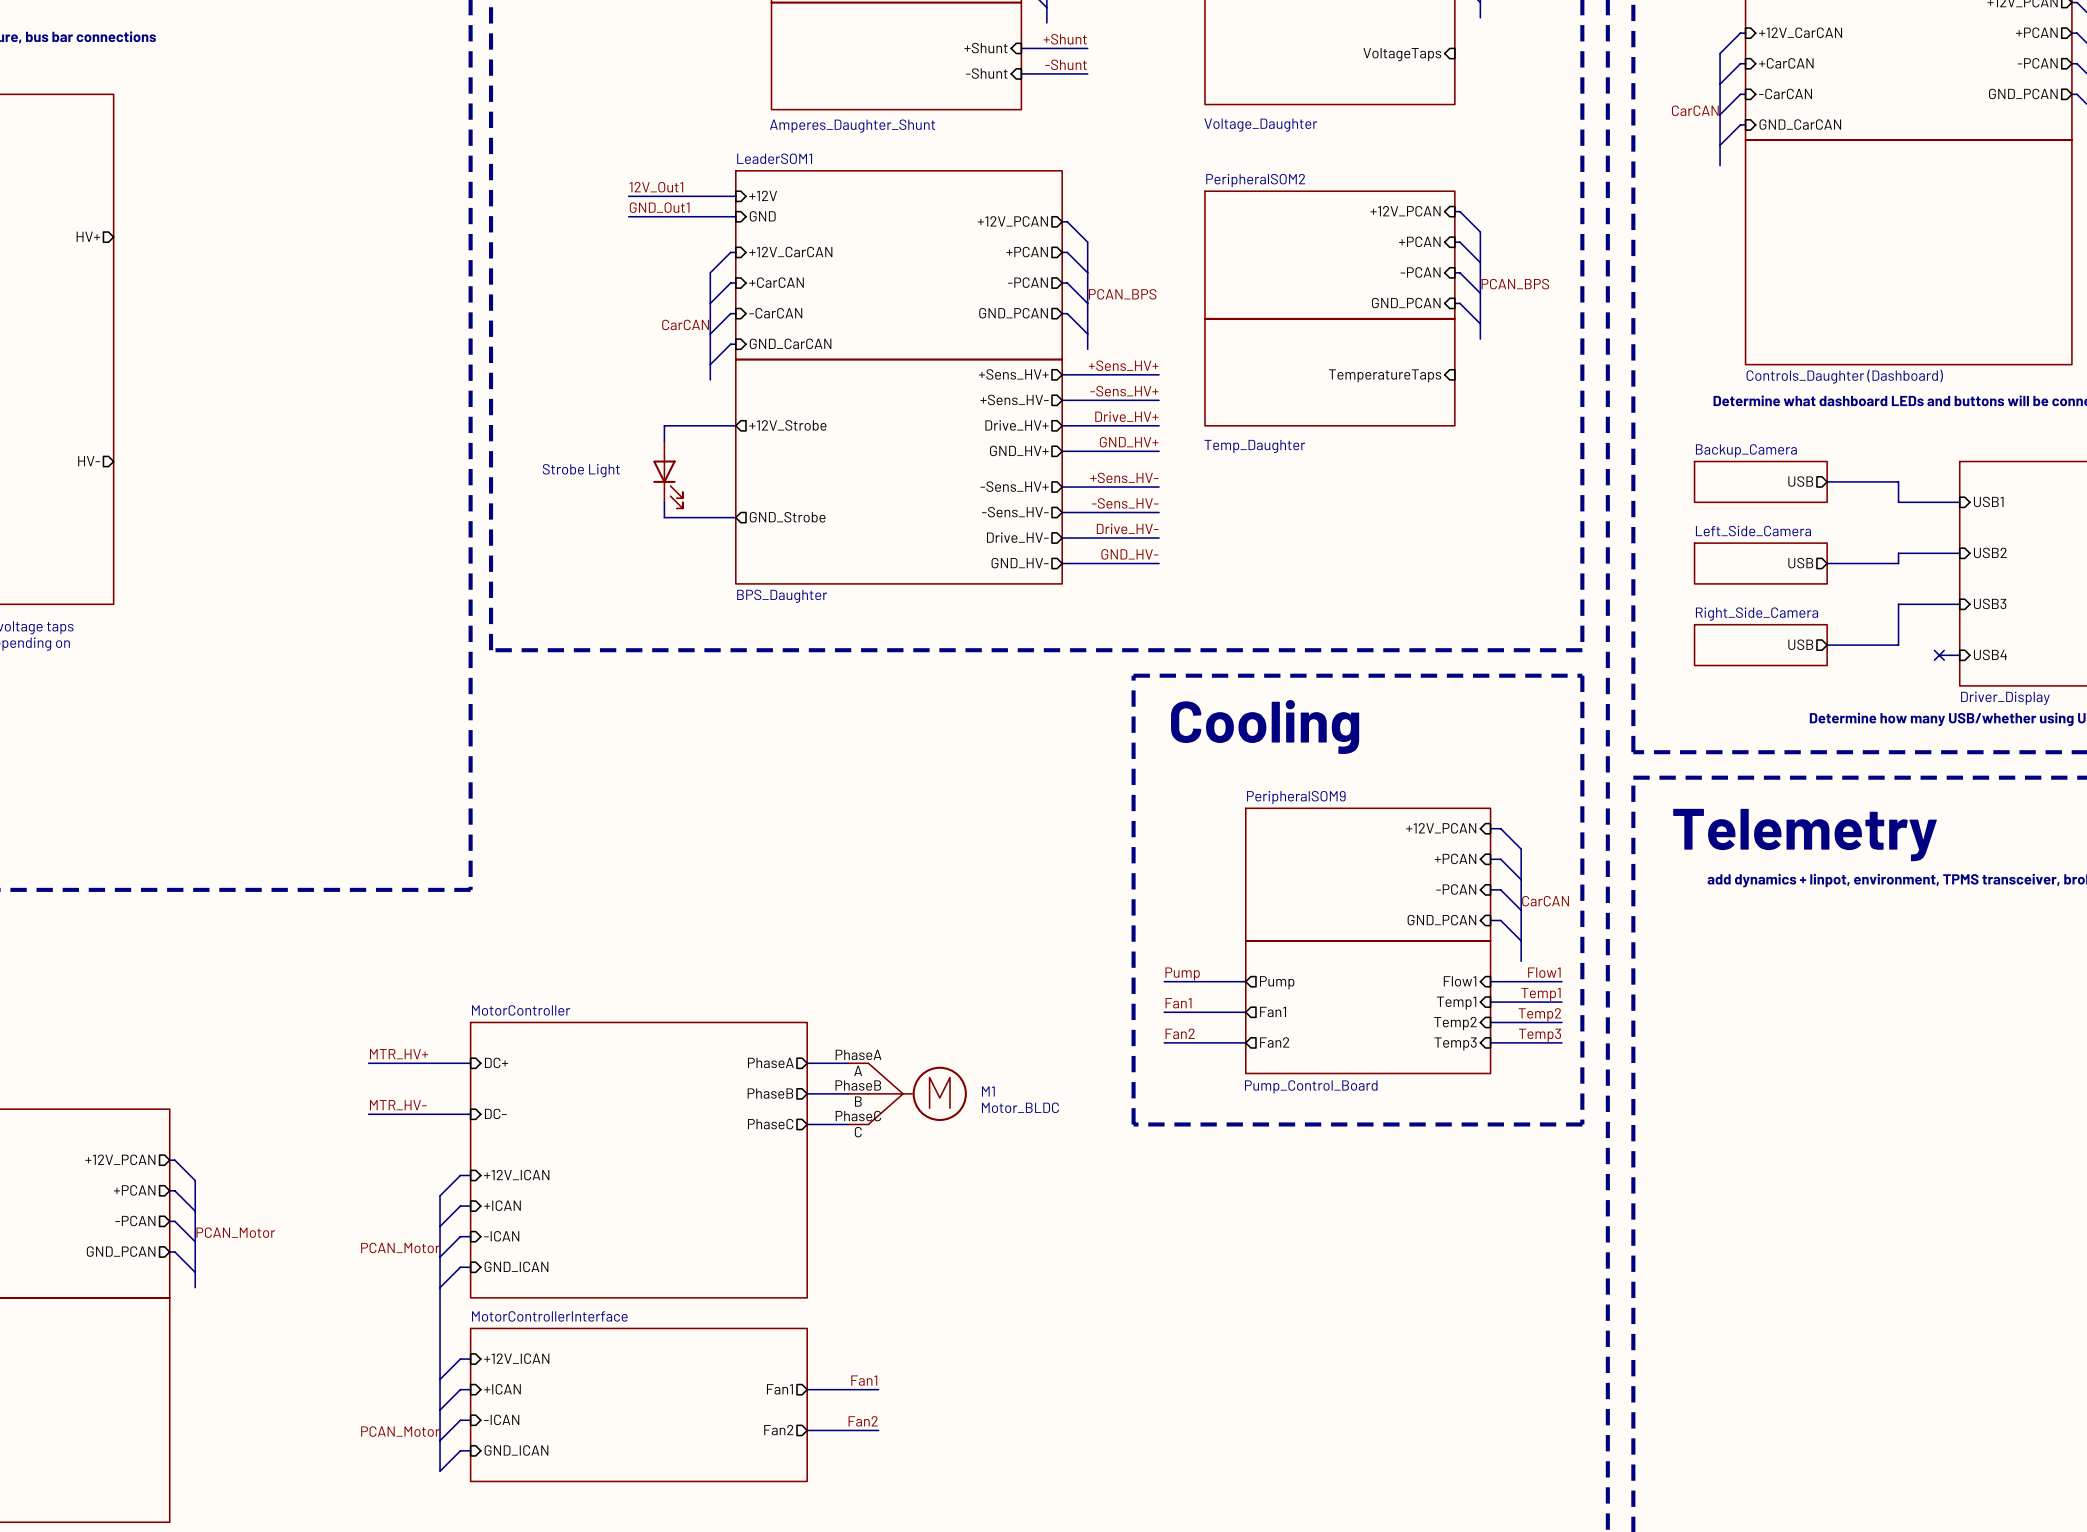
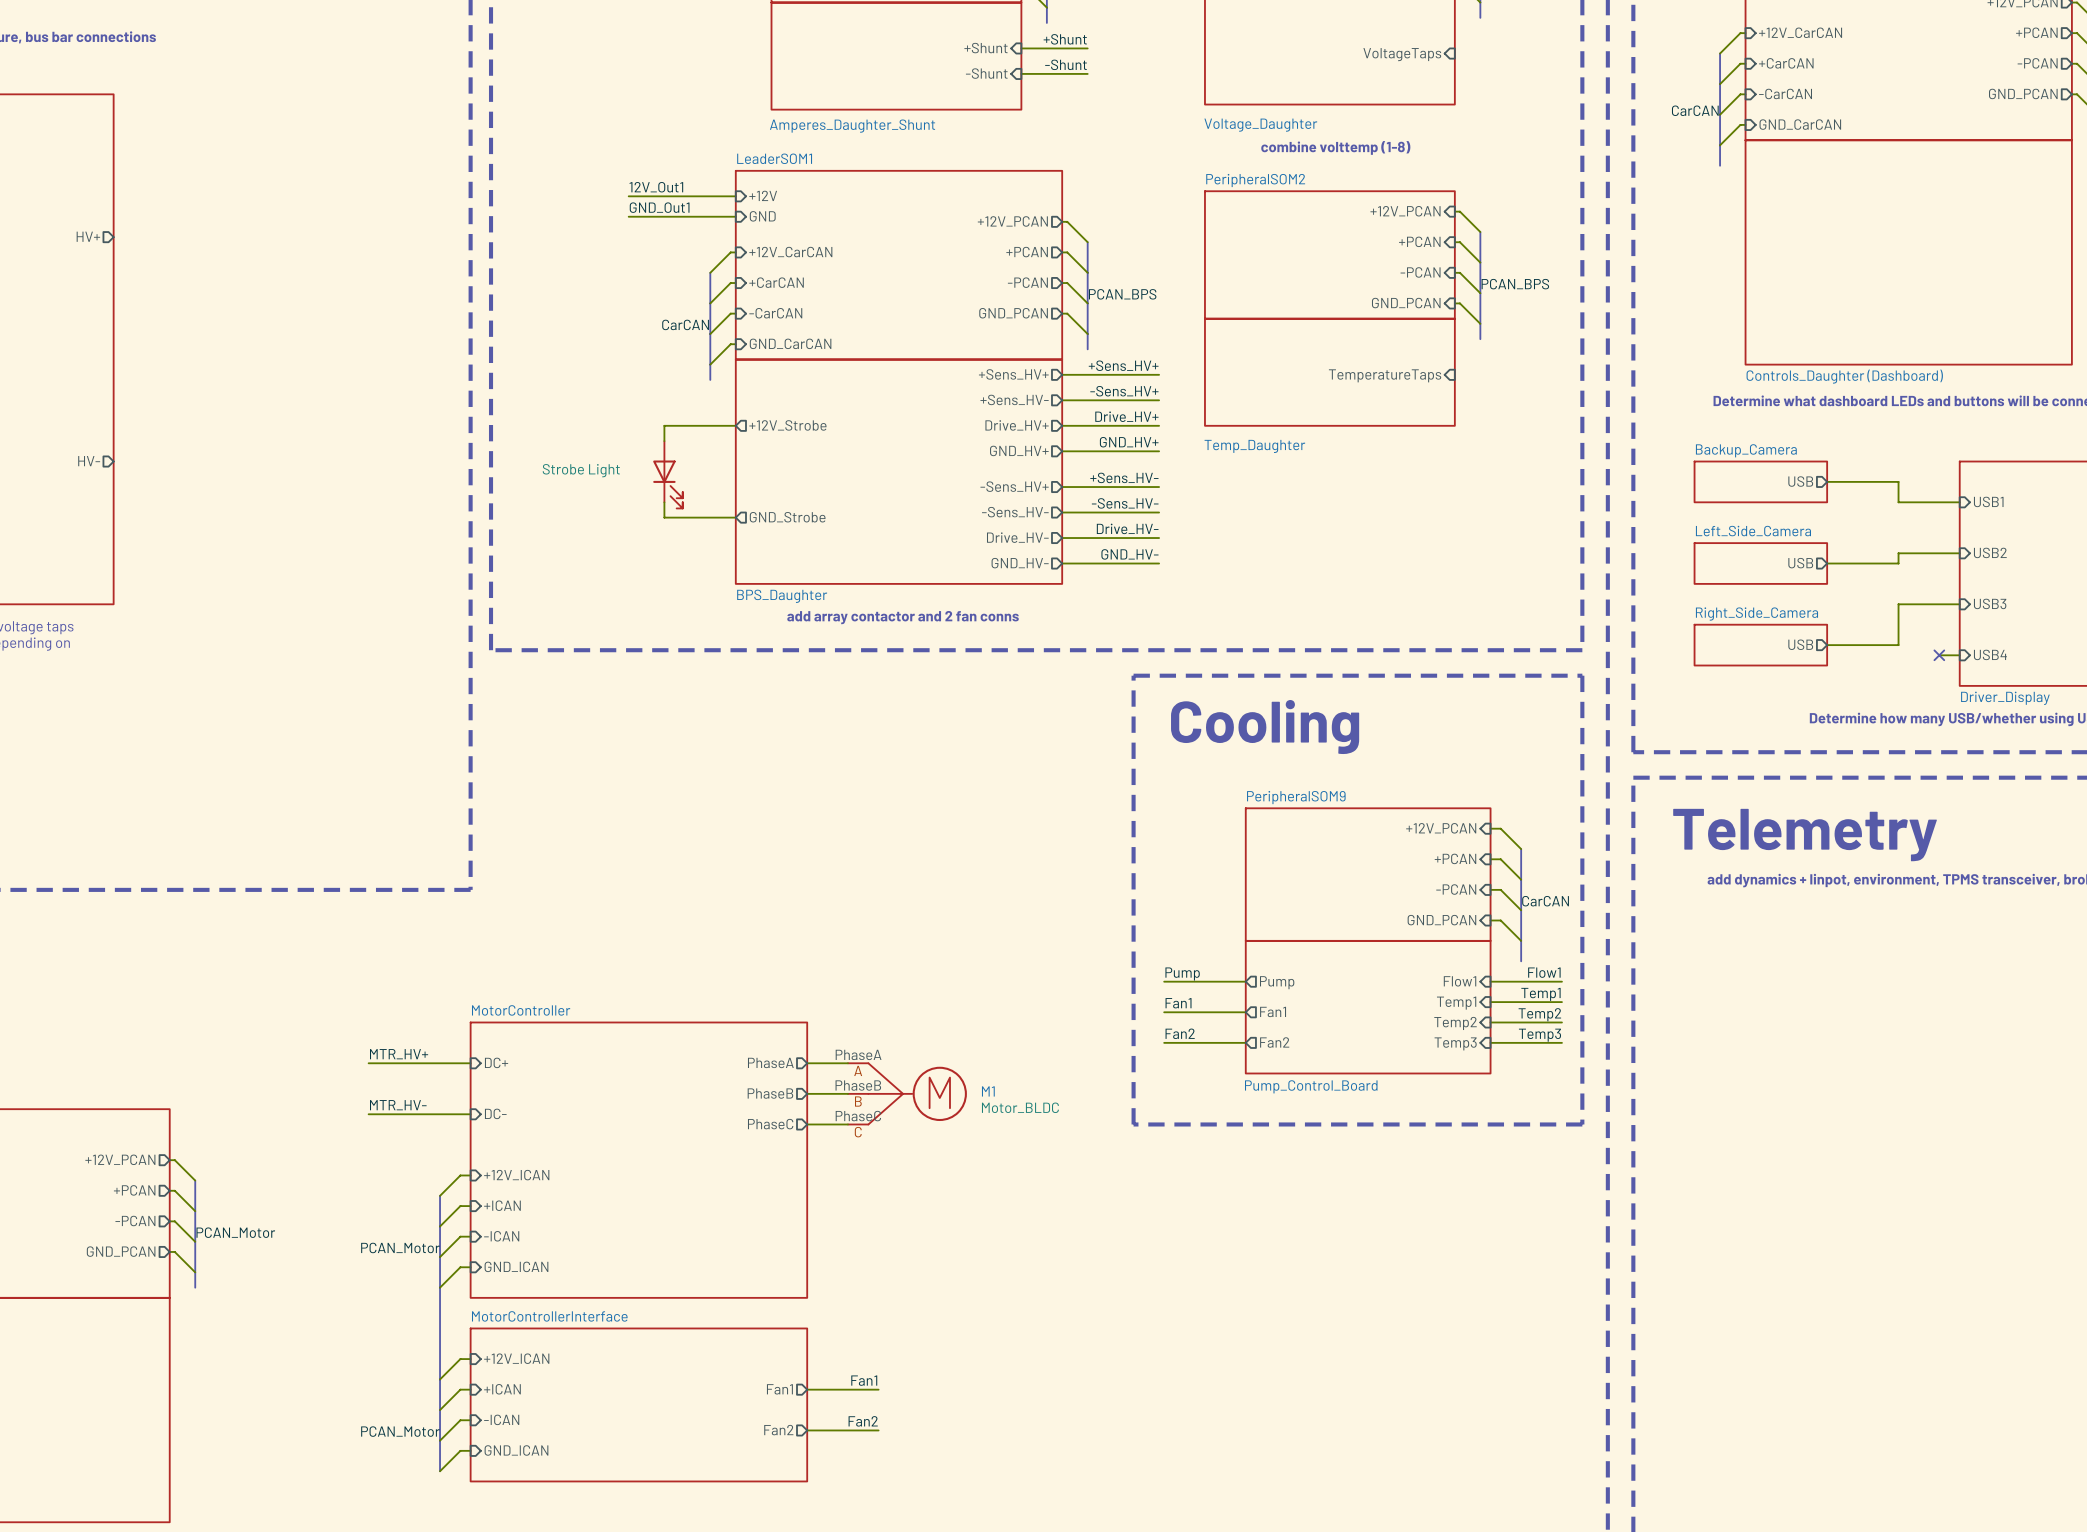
text: none -> combine volttemp (1-8) (1335, 147)
text: none -> add array contactor and 2 fan conns (903, 617)

